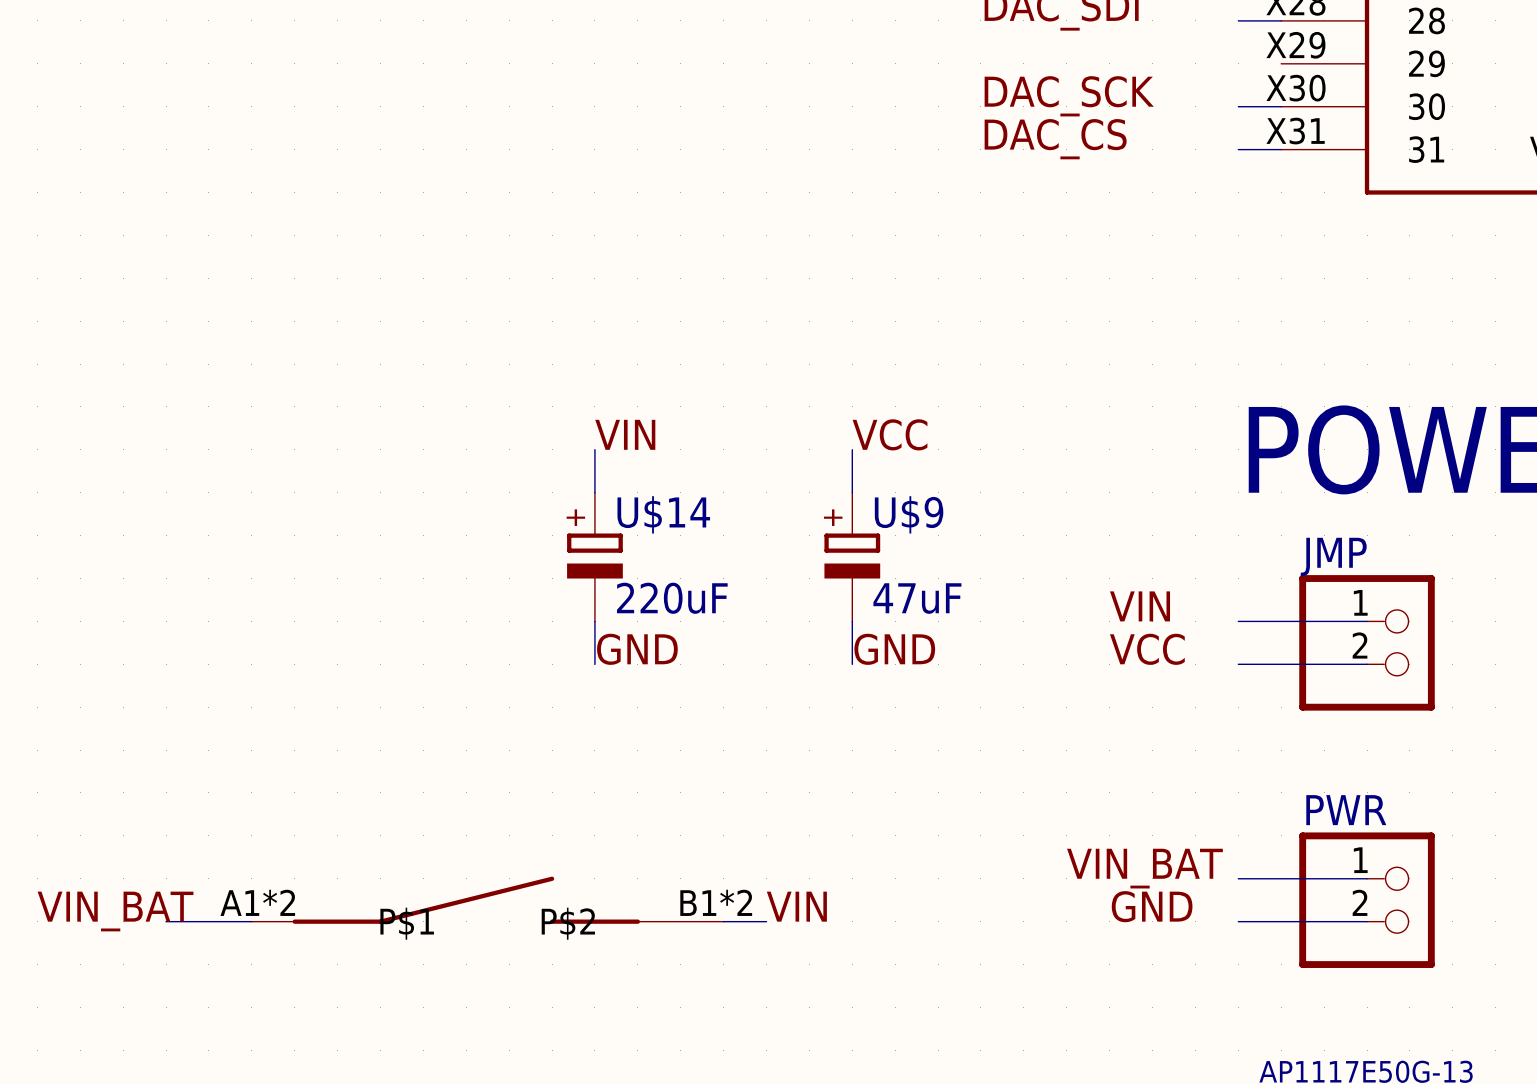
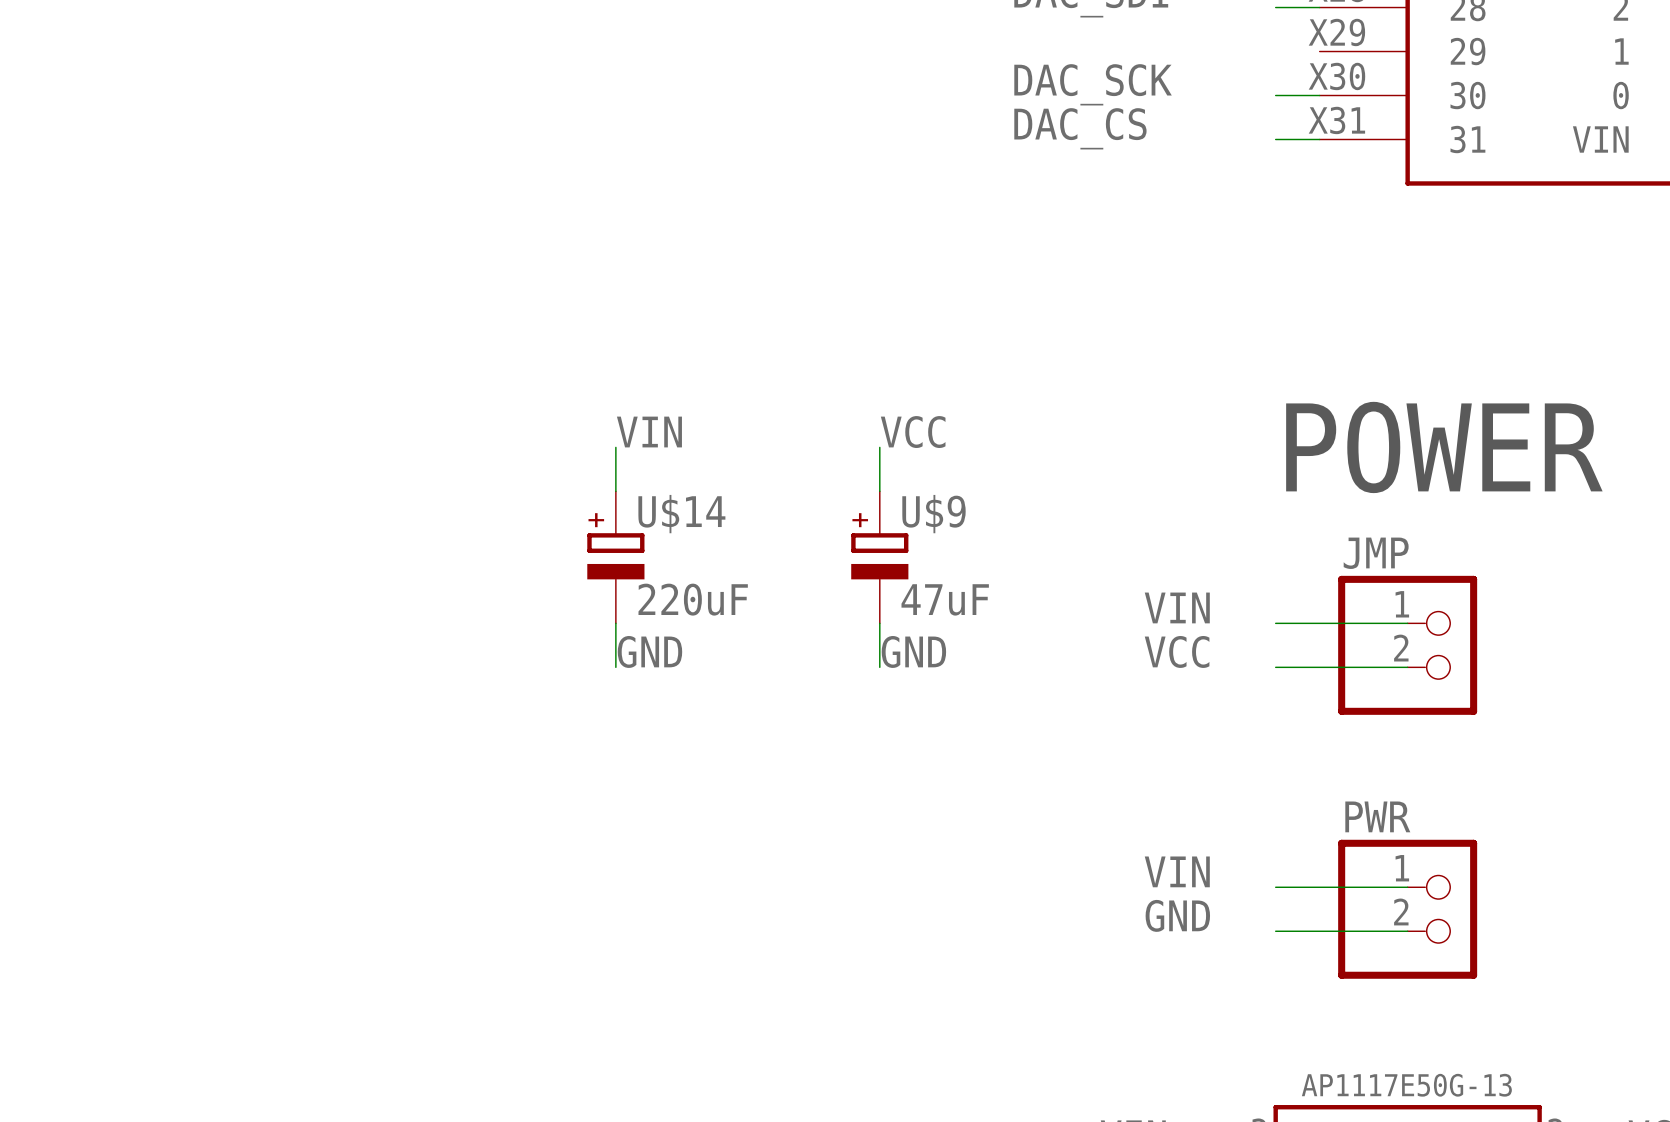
label: VIN_BAT (1144, 868) -> none
part: (487, 900) -> none
label position: VIN (796, 906) -> VIN (1177, 871)
label: VIN_BAT (115, 911) -> none
wire: (166, 921) (251, 921) -> none
wire: (723, 921) (766, 921) -> none

